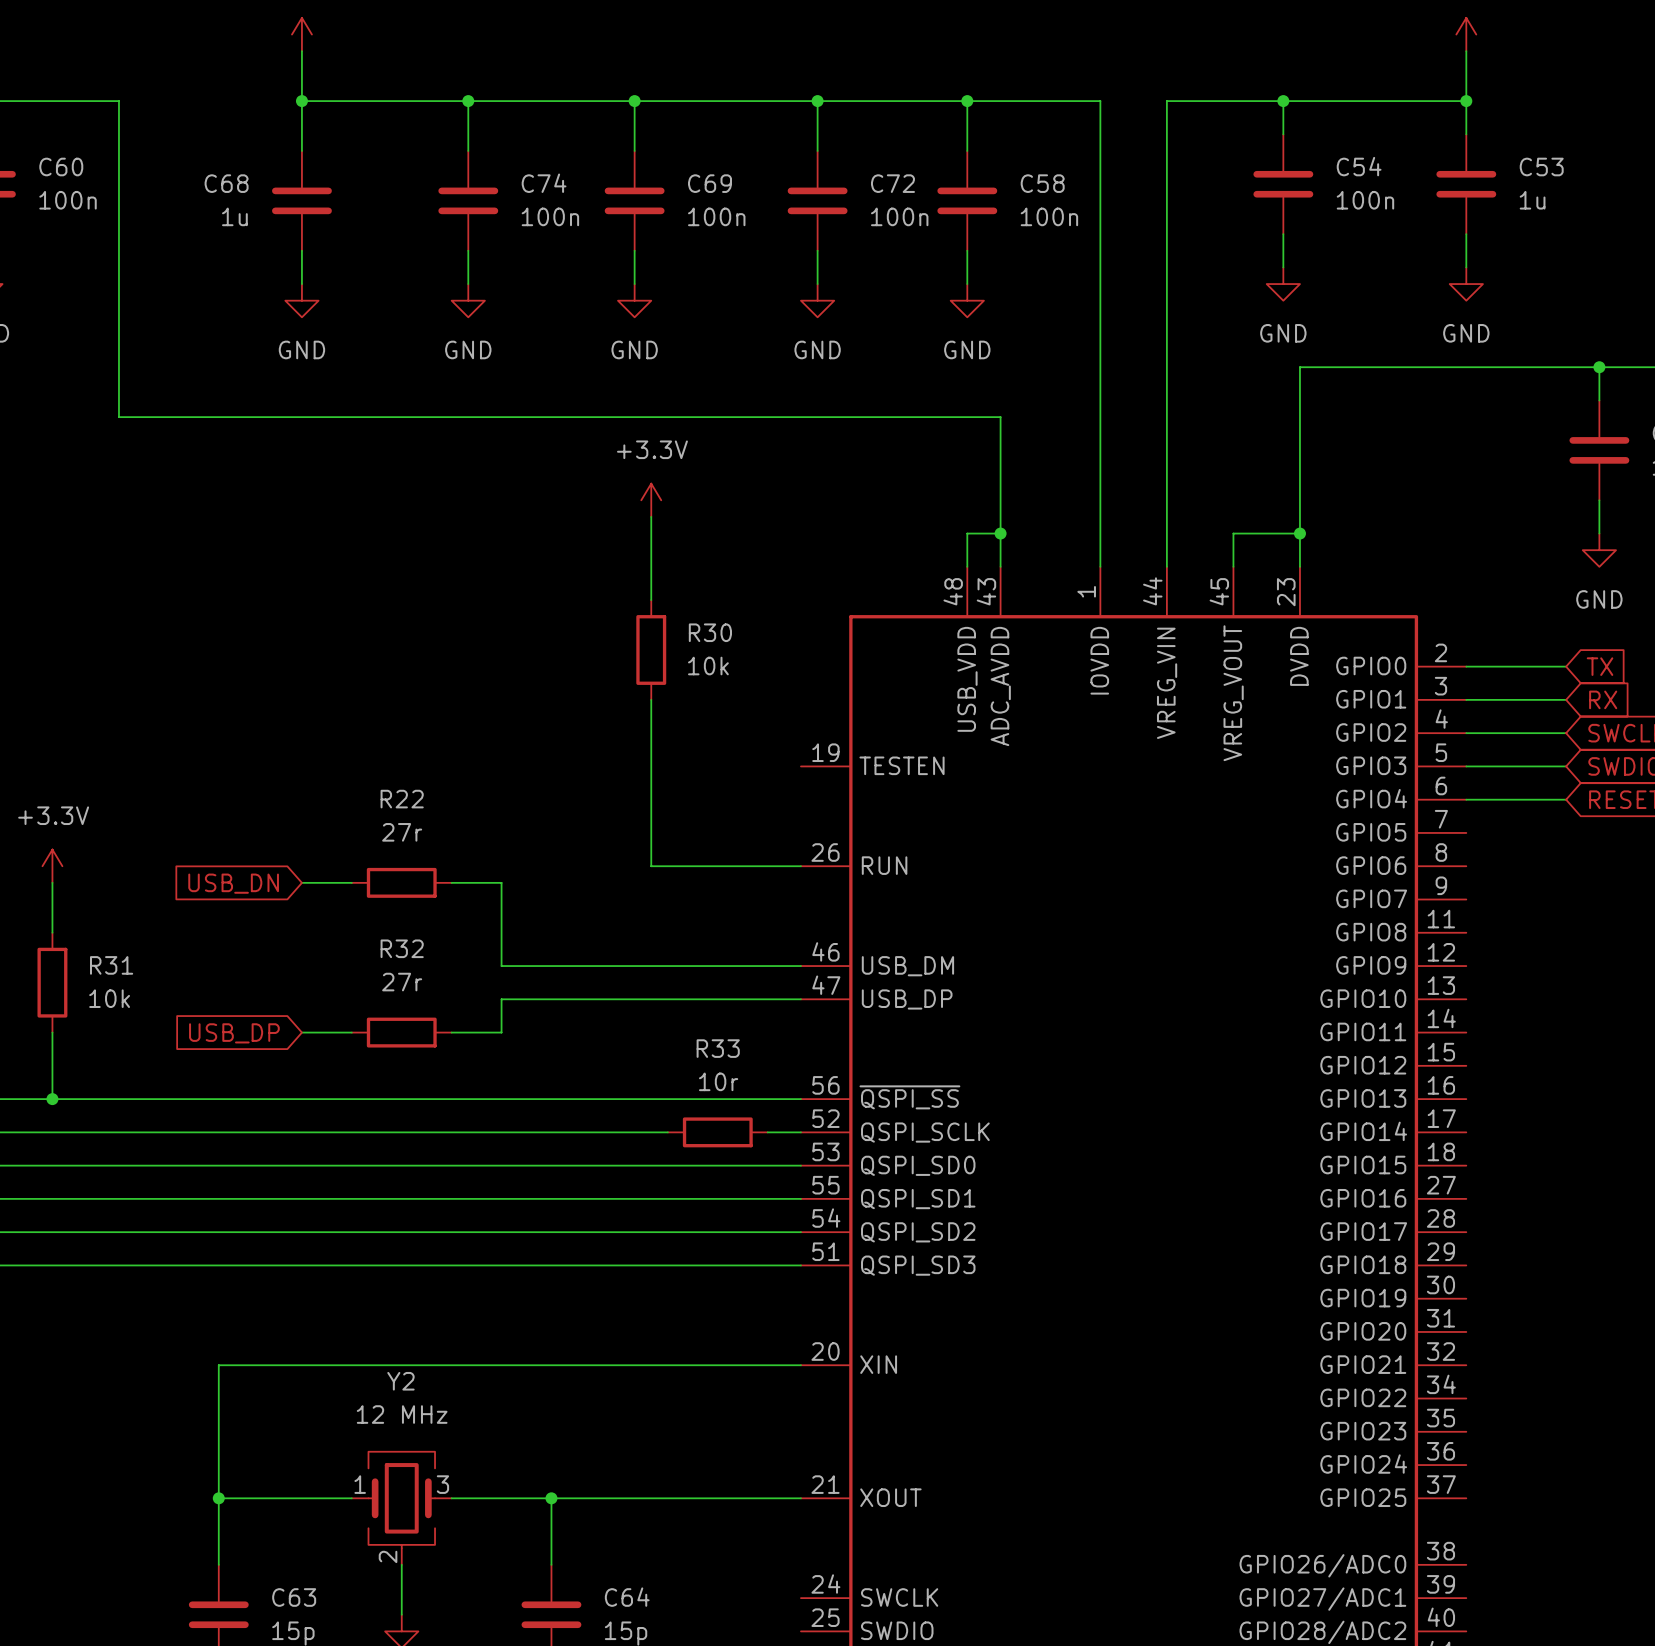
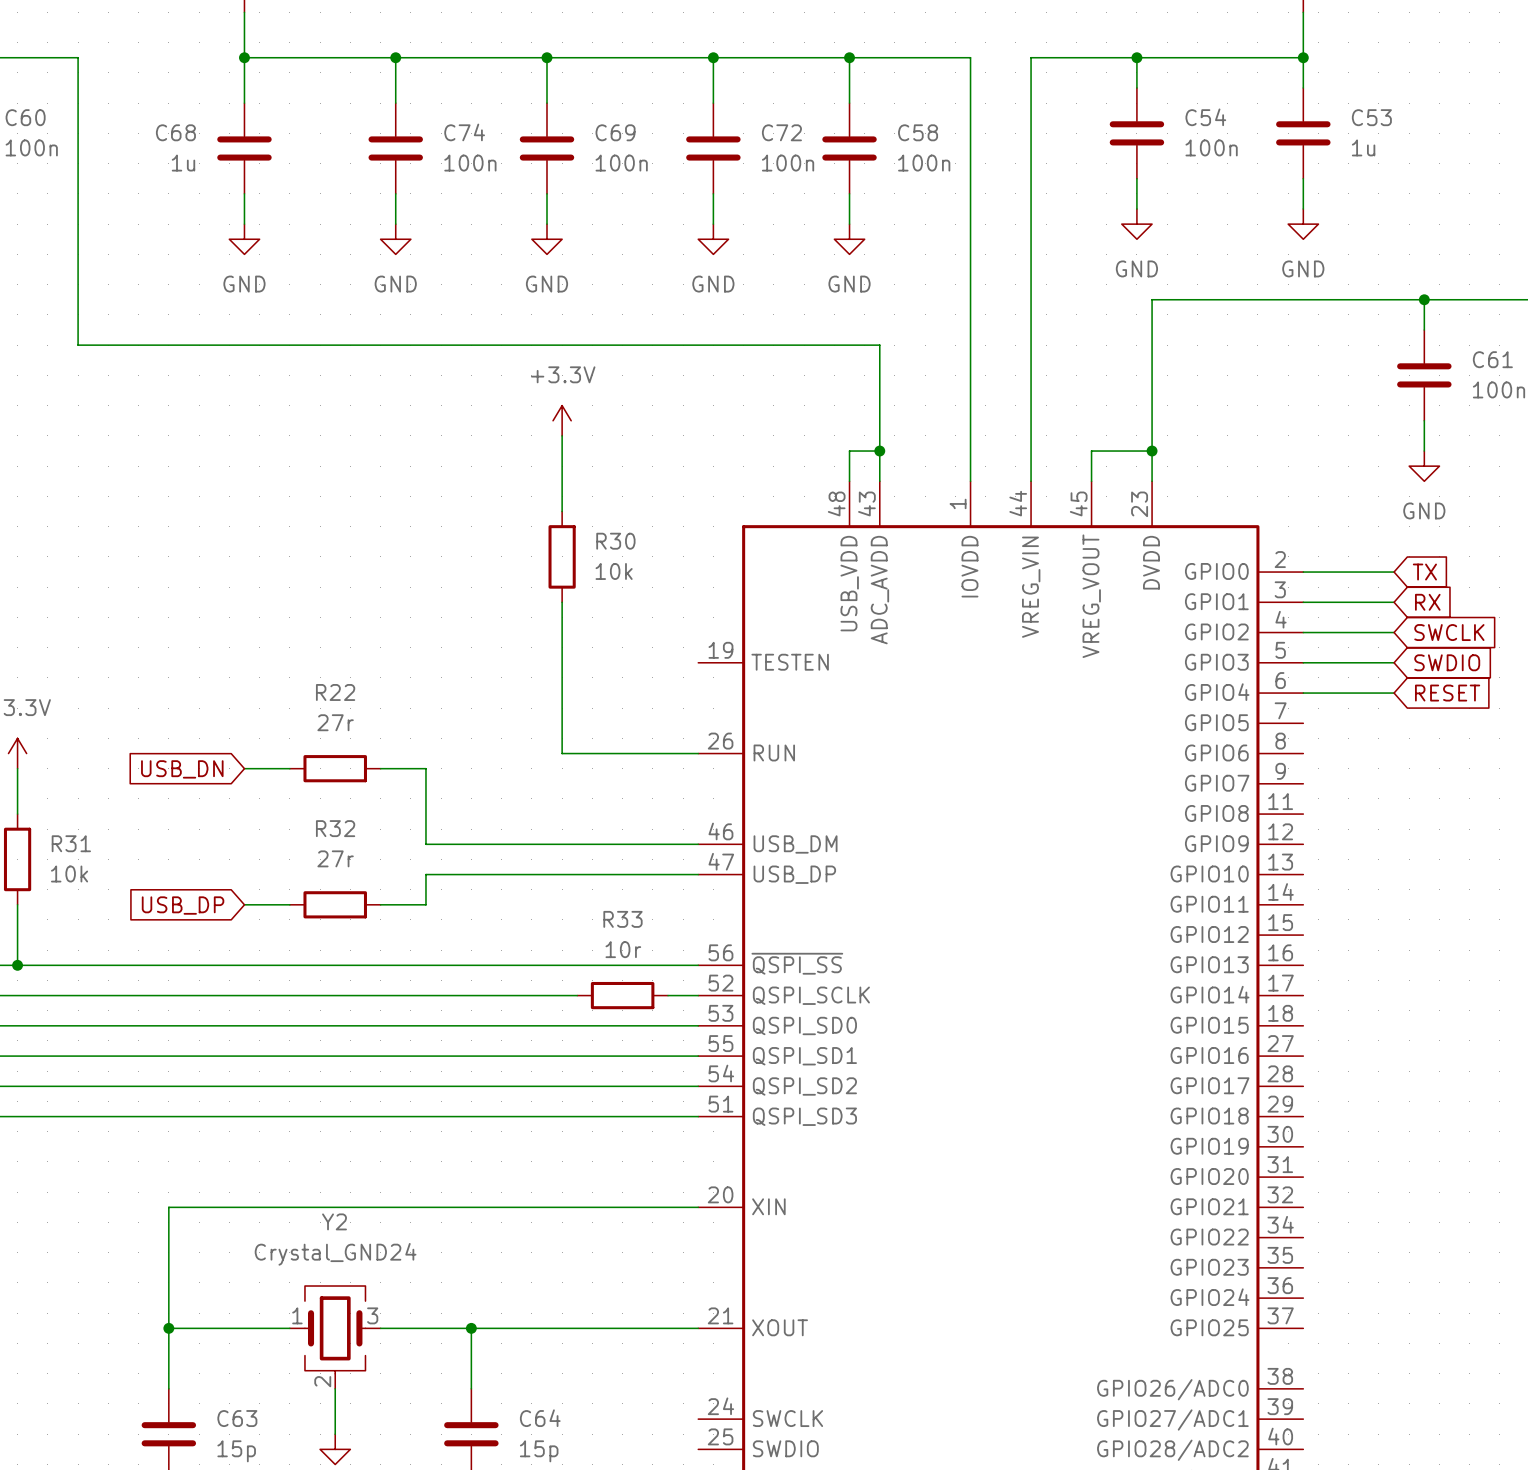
Y2 value: 12 MHz (402, 1414) -> Crystal_GND24 (335, 1254)

